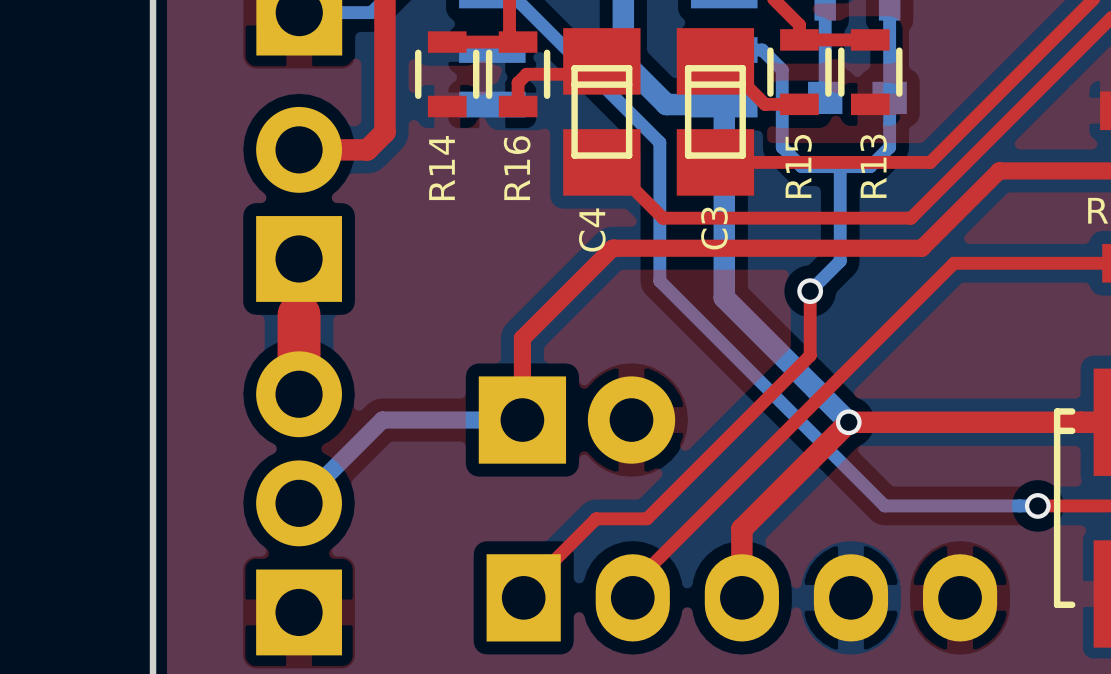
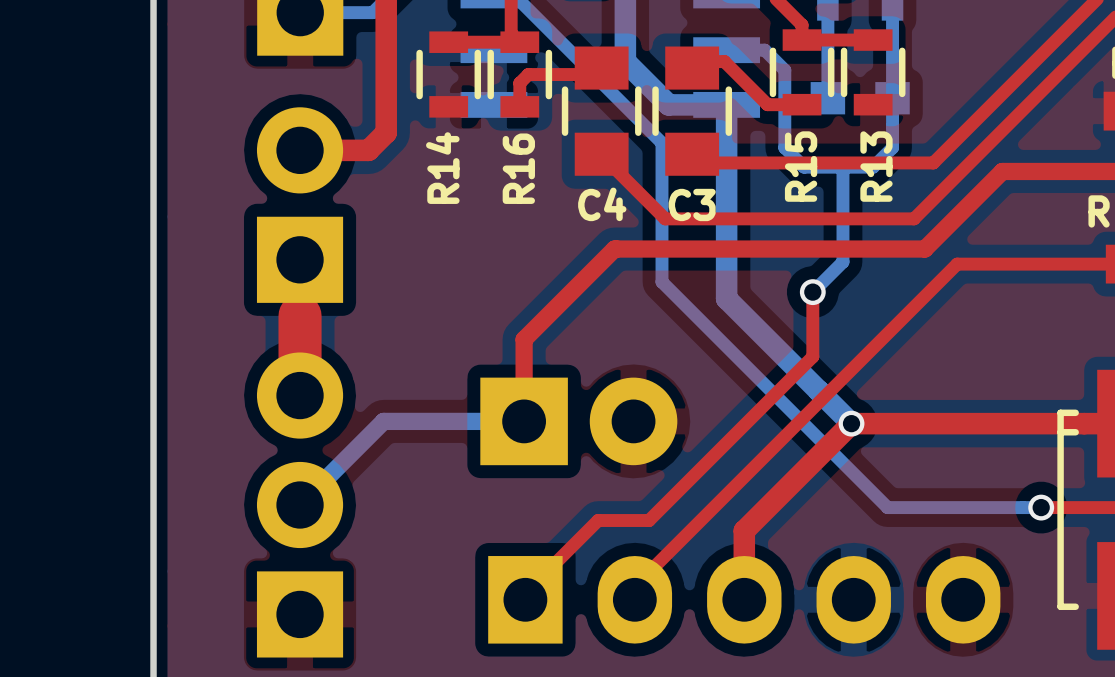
C4 footprint: [563, 28, 641, 196] -> [561, 46, 642, 176]
C3 footprint: [676, 28, 755, 196] -> [652, 46, 733, 176]

